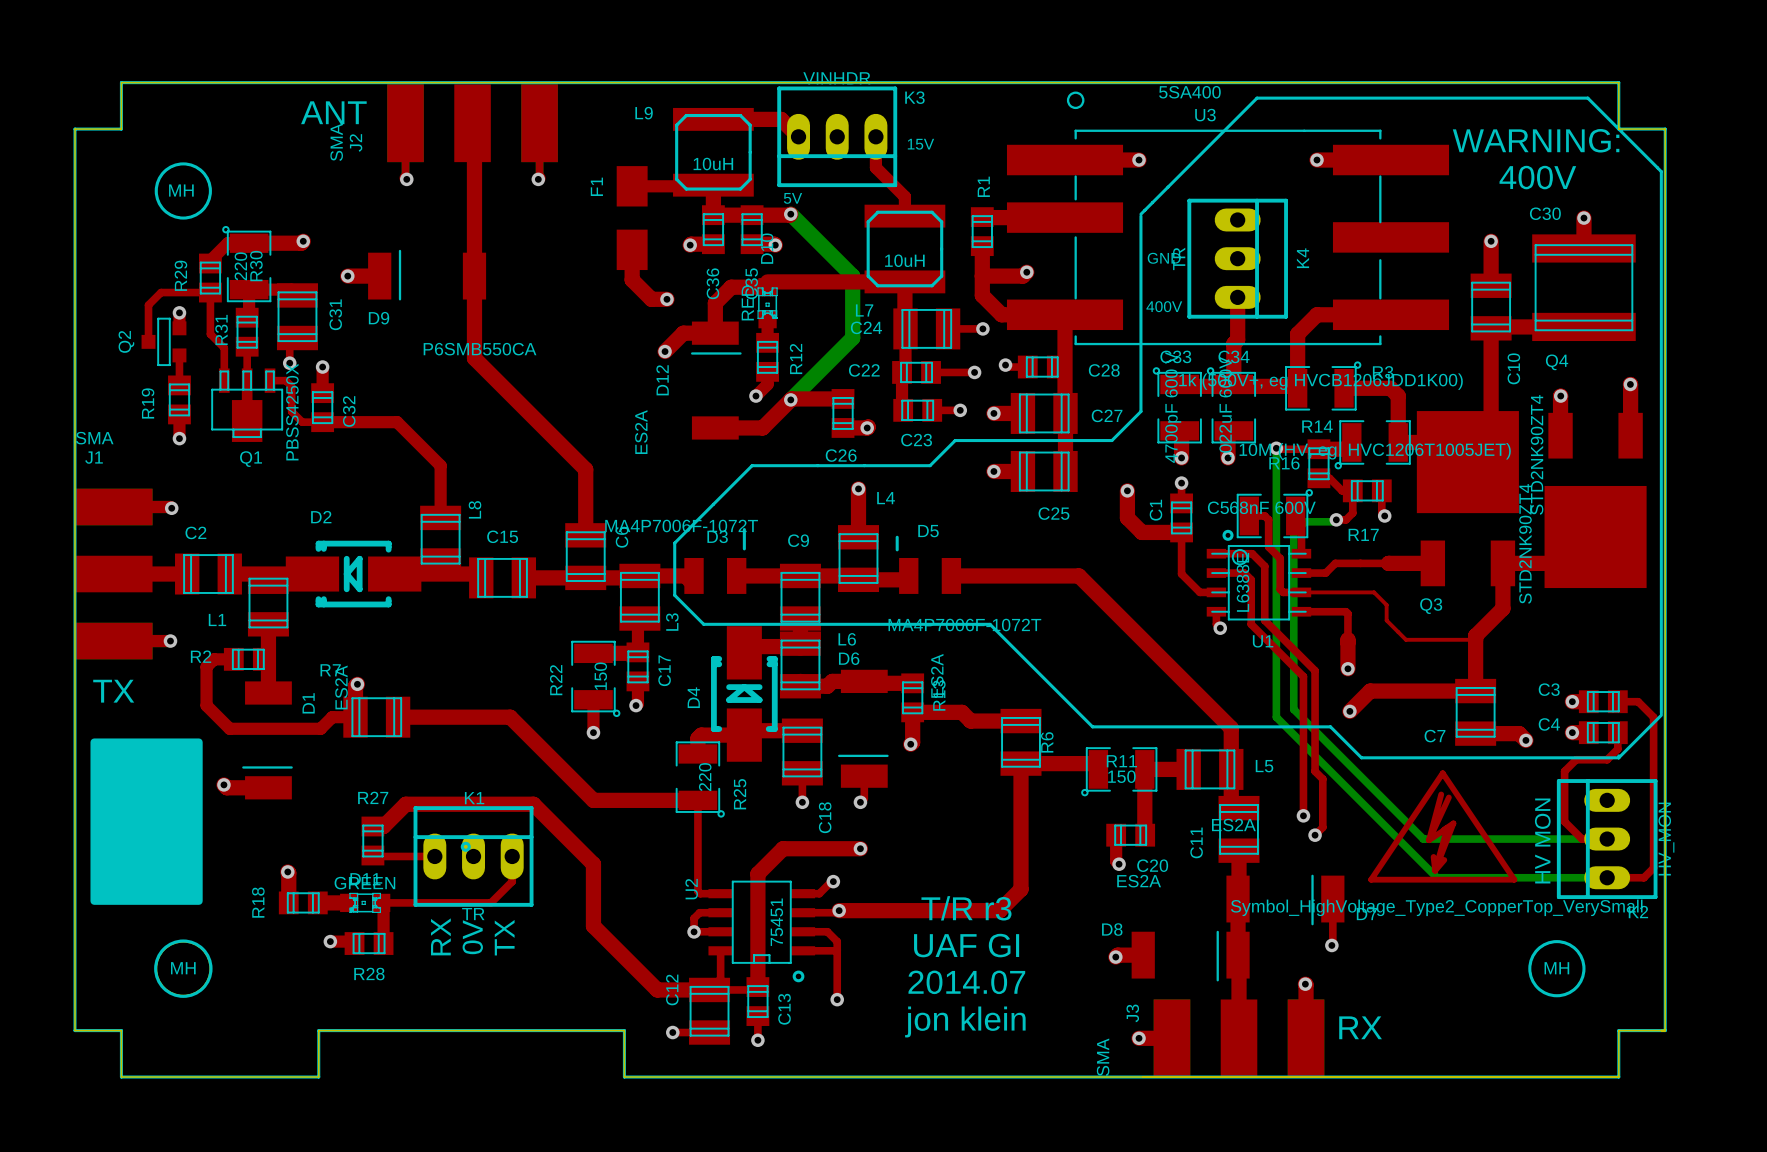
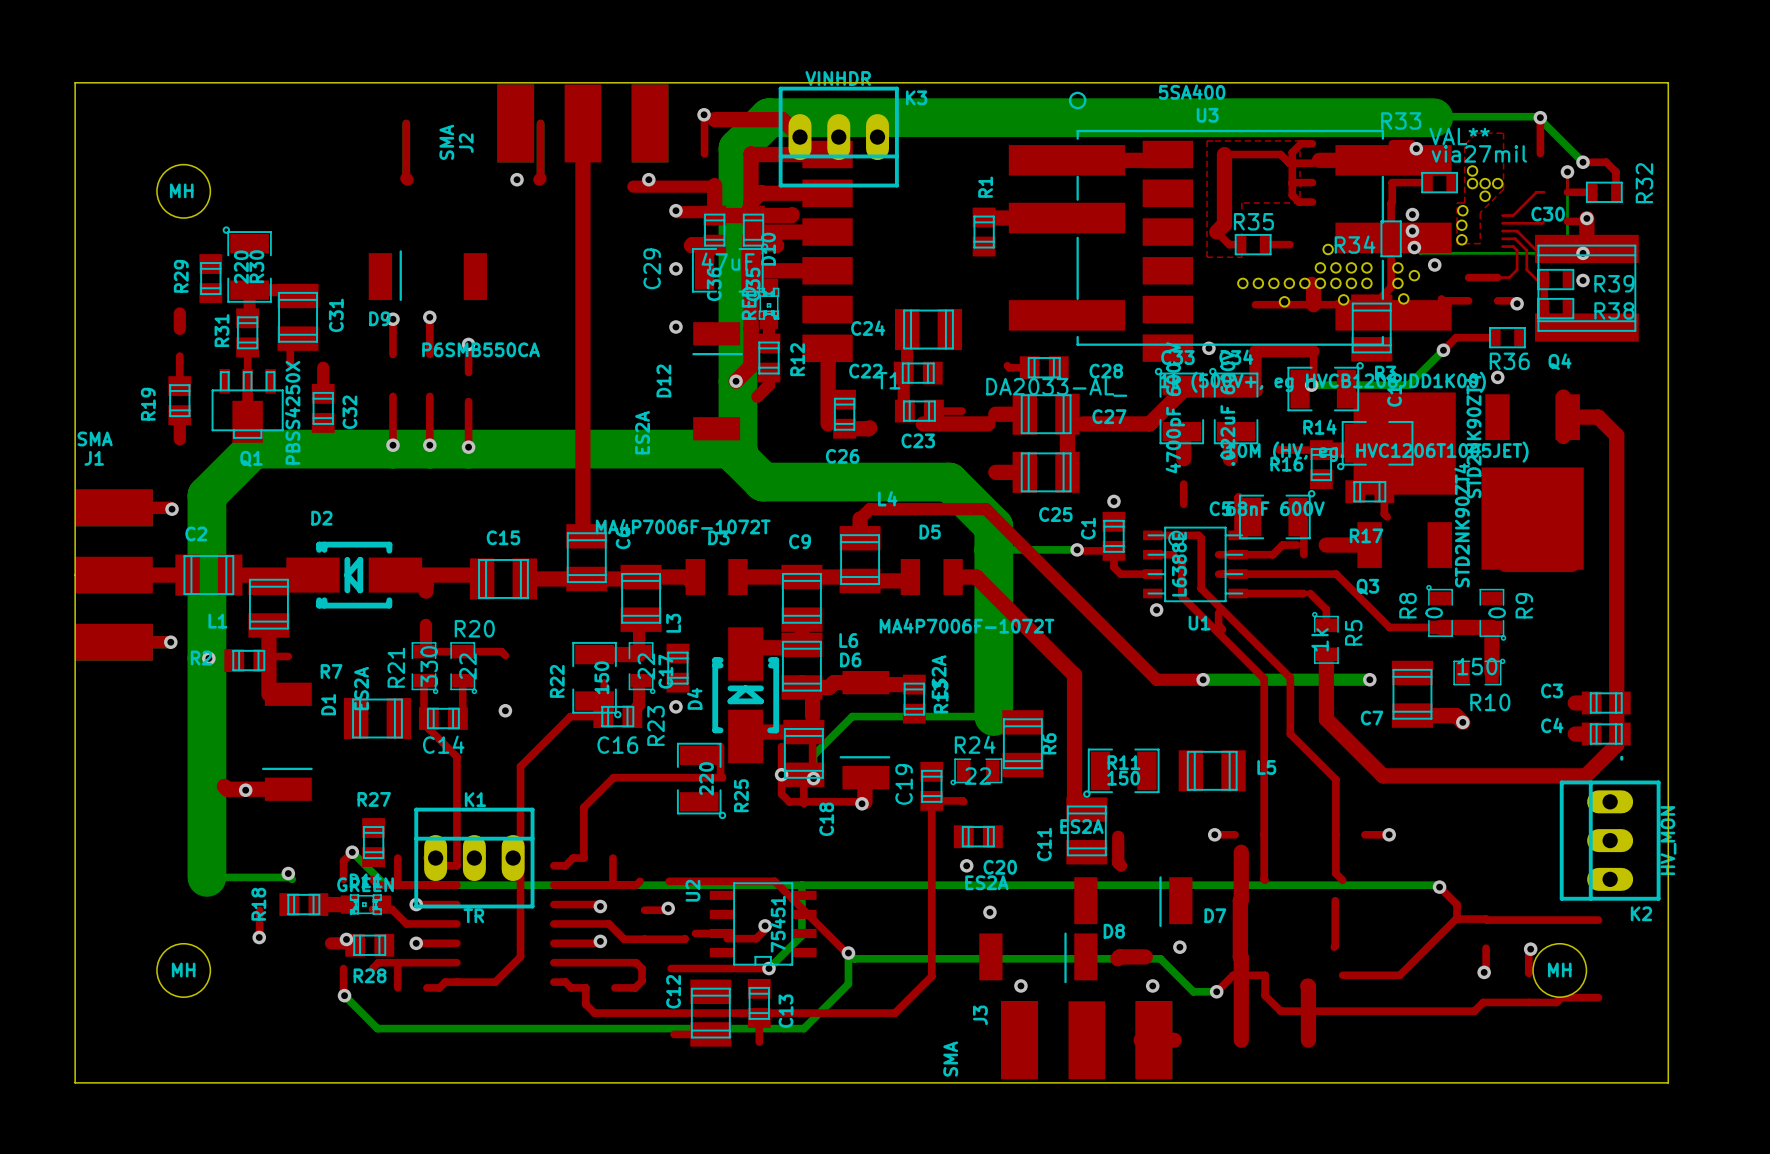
line: (121, 82) (121, 129) (74, 129) (74, 1030) (121, 1030) (121, 1077) (318, 1077) (318, 1030) (624, 1030) (624, 1077) (1618, 1077) (1618, 1030) (1665, 1030) (1665, 129) (1618, 129) (1618, 82) (121, 82) -> none
board edge: (121, 82) (121, 129) (74, 129) -> (121, 82) (75, 82) (75, 129)
board edge: (1618, 82) (1618, 129) (1665, 129) -> (1621, 82) (1668, 82) (1668, 129)
text: ANT (333, 112) -> none
top track: none -> (704, 114) (704, 154)
via: none -> (704, 114)
bottom track: none -> (1433, 116) (1539, 116) (1583, 162)
bottom track: none -> (1427, 117) (1429, 115) (1433, 115) (1433, 117) (768, 117) (737, 148) (737, 456) (763, 482) (949, 482) (993, 526) (993, 716) (852, 716) (813, 755) (813, 778)
top track: none -> (1540, 117) (1540, 153)
via: none -> (1540, 117)
top track: (472, 123) (474, 125) (474, 358) (585, 469) (585, 535) -> none
J2 position: (472, 123) -> (582, 123)
top track: none -> (582, 123) (582, 532)
top zone outline: none -> (1476, 133) (1464, 144) (1464, 202) (1457, 202) (1457, 243) (1480, 243) (1480, 212) (1503, 189) (1503, 133) (1476, 133)
top track: (875, 136) (875, 167) (904, 196) (904, 216) -> none
top zone outline: none -> (1207, 140) (1207, 257) (1241, 257) (1241, 202) (1300, 202) (1300, 140) (1207, 140)
text: WARNING: (1536, 140) -> none
top track: none -> (1312, 143) (1301, 143) (1292, 152) (1292, 195) (1299, 202) (1312, 202)
top track: none -> (1392, 143) (1411, 143) (1416, 148)
text: 15V (920, 144) -> none
via27mil: none -> VAL** (1478, 145)
via: none -> (1416, 148)
L9: 10uH (713, 152) -> none
top track: none -> (827, 154) (751, 154) (751, 366) (736, 381)
via: (1139, 160) -> none
via: (1317, 160) -> none
top track: none -> (1583, 162) (1606, 162) (1615, 171) (1615, 192)
via: none -> (1583, 162)
drawing: [154, 162, 212, 220] -> none
top track: none -> (1289, 163) (1280, 154) (1224, 154) (1224, 224) (1216, 232) (1229, 244) (1240, 245)
top track: none -> (1289, 163) (1312, 163)
part: none -> (1472, 170)
top track: none -> (1567, 171) (1567, 192) (1592, 192)
bottom track: none -> (1567, 171) (1567, 237) (1551, 253) (1420, 253) (1414, 247)
via: none -> (1567, 171)
text: 400V (1537, 177) -> none
via: (406, 179) -> none
via position: (538, 179) -> (517, 179)
via: none -> (648, 179)
top track: none -> (1292, 182) (1312, 182)
top track: none -> (1427, 182) (1392, 182) (1392, 201)
R33: none -> (1439, 182)
part: none -> (1472, 183)
part: none -> (1485, 183)
part: none -> (1497, 183)
top track: none -> (1544, 192) (1536, 192) (1513, 215) (1502, 215)
R32: none -> (1604, 192)
top track: none -> (827, 193) (760, 192) (751, 202)
part: none -> (1485, 196)
text: 5V (793, 198) -> none
top track: none -> (1392, 202) (1391, 227)
top track: none -> (675, 210) (704, 212)
via: none -> (675, 210)
part: none -> (1462, 210)
bottom track: (790, 214) (852, 276) (852, 338) (790, 399) -> none
via: (790, 214) -> none
line: (1140, 214) (1257, 98) (1587, 98) (1661, 171) (1661, 713) -> none
via: none -> (1412, 214)
line: (1140, 216) (1140, 411) (1111, 440) (955, 440) (930, 465) (752, 465) (674, 543) (674, 595) (703, 624) (990, 624) (1092, 726) (1330, 726) (1361, 757) (1618, 757) (1661, 715) -> none
F1: (632, 218) -> none
top track: none -> (1544, 221) (1542, 223) (1502, 223)
top track: none -> (1567, 221) (1583, 222)
part: none -> (1461, 225)
top track: none -> (751, 231) (827, 232)
via: none -> (1412, 231)
top track: none -> (1502, 231) (1517, 231) (1536, 250) (1544, 250)
R34: none -> (1391, 238)
top track: none -> (1502, 238) (1515, 238) (1526, 250) (1526, 269) (1536, 279) (1544, 279) (1544, 308)
part: none -> (1461, 239)
top track: (303, 241) (301, 243) (227, 243) (210, 260) (210, 263) -> none
via: (303, 241) -> none
top track: (1491, 241) (1491, 285) -> none
via: (1491, 241) -> none
R35: none -> (1253, 244)
top track: none -> (1264, 244) (1289, 244)
via: (690, 245) -> none
via: (775, 245) -> none
top track: (982, 246) (982, 295) (1001, 314) (1065, 314) (1065, 412) (1065, 413) (1065, 375) (1056, 367) -> none
top track: none -> (1502, 246) (1513, 246) (1517, 250) (1517, 269) (1509, 277) (1468, 277)
via: none -> (1414, 247)
top track: (632, 249) (632, 279) (651, 299) (666, 299) -> none
L7: 10uH (904, 249) -> none
part: none -> (1328, 249)
top track: none -> (1391, 250) (1391, 287) (1371, 306) (1369, 304) (1255, 304)
T1: none -> DA2033-AL_ (997, 251)
via: none -> (1583, 253)
text: GND (1164, 258) -> none
K4: TR (1237, 258) -> none
via: none -> (1434, 264)
C29: none -> 47uF (730, 267)
part: none -> (1320, 267)
part: none -> (1335, 267)
part: none -> (1351, 267)
part: none -> (1366, 267)
part: none -> (1397, 267)
via: none -> (675, 268)
top track: none -> (751, 270) (827, 270)
top track: (1026, 272) (1022, 276) (982, 276) -> none
via: (1026, 272) -> none
part: none -> (1414, 275)
top track: (347, 276) (379, 276) -> none
via: (347, 276) -> none
R39: none -> (1555, 279)
via: none -> (1583, 280)
part: none -> (1242, 283)
part: none -> (1258, 283)
part: none -> (1273, 283)
part: none -> (1289, 283)
part: none -> (1304, 283)
part: none -> (1320, 283)
part: none -> (1335, 283)
part: none -> (1351, 283)
part: none -> (1366, 283)
part: none -> (1397, 283)
top track: none -> (1311, 284) (1313, 286) (1313, 304)
top track: (1237, 297) (1237, 339) (1233, 343) (1233, 384) -> none
part: none -> (1403, 298)
top track: none -> (1441, 298) (1443, 300) (1468, 300)
via: (666, 299) -> none
part: none -> (1343, 299)
top track: none -> (1497, 300) (1514, 300) (1517, 303)
part: none -> (1284, 301)
via: none -> (1517, 303)
text: 400V (1164, 306) -> none
C10 position: (1491, 307) -> (1371, 327)
R38: none -> (1555, 308)
via: (179, 312) -> none
top track: (1391, 314) (1317, 314) (1297, 334) (1297, 388) (1295, 386) (1181, 386) -> none
top track: none -> (429, 317) (429, 354)
via: none -> (429, 317)
top track: none -> (392, 319) (392, 354)
via: none -> (392, 319)
via: none -> (675, 327)
top track: (1583, 326) (1491, 328) (1491, 438) -> none
top track: (906, 327) (904, 328) (904, 281) (767, 281) (767, 287) (731, 287) (715, 303) (715, 333) (683, 333) (665, 351) -> none
top track: (947, 328) (982, 328) -> none
via: (982, 328) -> none
top track: none -> (1495, 337) (1456, 337) (1443, 350)
R36: none -> (1507, 337)
top track: (148, 341) (148, 305) (161, 292) (210, 292) (210, 334) (224, 348) (224, 380) -> none
Q2: (163, 341) -> none
top track: none -> (468, 344) (468, 372)
via: none -> (468, 344)
top track: none -> (827, 348) (828, 423)
via: none -> (1208, 348)
bottom track: none -> (1443, 350) (1408, 385) (1311, 385)
via: none -> (1443, 350)
via: (665, 351) -> none
via: (289, 363) -> none
via: (1005, 365) -> none
via: (322, 367) -> none
top track: (937, 372) (974, 372) -> none
via: (974, 372) -> none
via: none -> (1497, 377)
top track: (270, 380) (285, 380) (291, 386) (291, 411) (302, 422) (322, 422) -> none
top track: none -> (1311, 385) (1313, 383) (1313, 351) (1255, 351) (1255, 389) (1183, 389) (1149, 423) (1082, 423)
via: none -> (1311, 385)
top track: (1630, 384) (1630, 435) -> none
via: (1630, 384) -> none
top track: (1344, 388) (1390, 388) (1398, 396) (1398, 442) (1448, 442) -> none
top track: none -> (392, 396) (392, 445)
top track: none -> (429, 396) (429, 445)
via position: (755, 396) -> (736, 381)
via: (1560, 396) -> none
top track: (843, 398) (791, 398) (762, 427) (715, 427) -> none
via: (790, 399) -> none
top track: none -> (468, 401) (468, 447)
via: (960, 410) -> none
via: (993, 413) -> none
top track: none -> (1567, 417) (1598, 417) (1616, 435) (1616, 744) (1585, 775) (1382, 775) (1326, 719) (1326, 654)
top track: (322, 422) (397, 422) (440, 465) (440, 517) -> none
top track: none -> (923, 423) (987, 423)
via: (867, 427) -> none
via: (179, 438) -> none
via: none -> (392, 445)
via: none -> (429, 445)
via: none -> (468, 447)
bottom track: none -> (737, 449) (253, 449) (206, 495) (206, 877) (290, 877) (292, 879)
bottom track: (1276, 448) (1276, 717) (1436, 877) (1607, 877) -> none
via: (1276, 448) -> none
via: (1181, 457) -> none
via: (1228, 457) -> none
via: (993, 471) -> none
top track: (1318, 478) (1329, 478) (1342, 490) (1352, 490) (1352, 513) (1346, 519) (1336, 519) -> none
via: (1181, 483) -> none
top track: (858, 488) (858, 517) -> (1203, 679) (1156, 679) (986, 509) (869, 509) (860, 518)
via: (858, 488) -> none
top track: (1127, 490) (1127, 517) (1141, 532) (1181, 532) (1181, 574) (1199, 592) (1216, 592) -> none
via position: (1127, 490) -> (1113, 501)
top track: none -> (1238, 496) (1238, 535)
Q3 position: (1467, 498) -> (1404, 480)
Q4 position: (1595, 500) -> (1532, 481)
top track: (1249, 515) (1264, 515) (1268, 519) (1268, 546) (1280, 558) (1280, 589) (1283, 592) -> (1238, 593) (1285, 593)
via: (1384, 515) -> none
C1 position: (1181, 517) -> (1113, 536)
bottom track: (1336, 519) (1334, 521) (1305, 521) (1293, 533) (1293, 709) (1423, 839) (1607, 839) -> none
via: (1336, 519) -> none
line: (744, 529) (744, 548) -> none
drawing: [1222, 529, 1234, 541] -> none
top track: none -> (1152, 535) (1198, 535) (1201, 538) (1201, 588) (1290, 677) (1290, 734) (1335, 779) (1335, 873) (1342, 880)
line: (897, 537) (897, 549) -> none
L8: (440, 539) -> none
top track: none -> (1326, 545) (1369, 545)
bottom track: none -> (993, 549) (1077, 549)
top track: none -> (1077, 549) (1113, 550) (1113, 567) (1120, 574) (1152, 574)
via: none -> (1077, 549)
top track: none -> (1152, 554) (1173, 554) (1181, 563) (1181, 596) (1264, 678) (1265, 880)
top track: (1252, 553) (1264, 566) (1264, 620) (1315, 670) (1315, 771) (1322, 779) (1322, 827) (1315, 835) -> (1254, 554) (1272, 554) (1282, 545) (1297, 545)
top track: (1432, 563) (1335, 563) (1325, 573) -> (1491, 672) (1491, 627) (1389, 627) (1336, 574) (1328, 574)
top track: (1503, 564) (1502, 608) (1475, 635) (1475, 691) (1370, 691) (1349, 711) -> none
top track: (1244, 573) (1251, 579) (1251, 624) (1303, 676) (1303, 815) -> (1246, 574) (1303, 574)
top track: (974, 575) (1079, 575) (1231, 728) (1231, 800) (1239, 808) -> (976, 577) (1074, 675) (1074, 797) (1086, 809)
top track: none -> (420, 578) (425, 584) (425, 591)
U1 position: (1258, 582) -> (1195, 564)
top track: (1307, 592) (1374, 592) (1386, 604) (1386, 620) (1405, 639) (1475, 639) -> (1310, 593) (1326, 609) (1326, 625)
via: none -> (1156, 609)
R8: none -> 0 (1439, 610)
top track: (1301, 611) (1346, 611) (1347, 613) (1347, 668) -> none
R9: none -> 0 (1492, 614)
top track: none -> (425, 624) (425, 649) (424, 651) (501, 651) (505, 655)
via: (1220, 628) -> none
R5: none -> 1k (1325, 637)
top track: none -> (271, 656) (288, 656)
via: none -> (208, 658)
top track: (233, 660) (233, 659) (214, 659) (206, 666) (206, 705) (229, 728) (320, 728) (332, 717) (355, 717) (355, 686) (357, 684) -> none
R21: none -> 330 (424, 668)
R20: none -> 22 (463, 668)
C17 position: (637, 666) -> (677, 668)
R23: none -> 22 (642, 668)
via: (1347, 668) -> none
R10: none -> 150 (1479, 671)
bottom track: none -> (1203, 679) (1369, 679)
via: none -> (1203, 679)
via: none -> (1369, 679)
top track: none -> (424, 680) (424, 713) (428, 718) (428, 728) (456, 756) (456, 865) (445, 865) (439, 859) (428, 859) (426, 858)
top track: none -> (462, 680) (462, 713) (457, 718)
top track: none -> (604, 682) (604, 715) (570, 716) (520, 766) (520, 956) (495, 982) (445, 982) (439, 987) (426, 987)
top track: none -> (801, 682) (812, 693) (812, 716)
via: (357, 684) -> none
text: TX (113, 691) -> none
top track: (593, 699) (593, 732) -> none
via: (1572, 701) -> none
top track: (1617, 701) (1638, 701) (1653, 717) (1653, 868) (1643, 877) (1607, 877) -> none
via position: (636, 705) -> (675, 706)
via: none -> (505, 710)
via: (1349, 711) -> none
C7 position: (1475, 712) -> (1412, 694)
C16: none -> (617, 716)
top track: (398, 717) (510, 717) (593, 800) (697, 800) (697, 891) (700, 893) (720, 893) -> none
C14: none -> (443, 718)
top track: (1021, 721) (970, 721) (962, 712) (912, 712) (912, 742) (910, 744) -> none
via: none -> (1462, 722)
via: (593, 732) -> none
via: (1572, 732) -> none
top track: (1617, 732) (1617, 749) (1607, 759) (1576, 759) (1564, 771) (1564, 821) (1582, 839) (1607, 839) -> none
top track: (1475, 733) (1519, 733) (1525, 740) -> (1412, 715) (1456, 715) (1462, 722)
top track: (744, 735) (701, 735) (697, 738) (697, 753) -> none
drawing: [90, 738, 203, 905] -> none
D1 position: (267, 740) -> (287, 741)
via: (1525, 740) -> none
top track: none -> (812, 745) (813, 778)
via: (910, 744) -> none
top track: none -> (720, 746) (720, 775) (722, 777) (613, 777) (583, 807) (583, 858) (573, 858) (565, 865) (553, 865)
top track: none -> (781, 746) (781, 794) (789, 801) (864, 801) (864, 777)
top track: (1098, 769) (1092, 763) (1021, 763) (1021, 889) (999, 910) (839, 910) (837, 912) (802, 912) -> none
top track: (1188, 769) (1144, 769) (1145, 835) -> none
R24: none -> 22 (976, 771)
drawing: [1368, 770, 1518, 883] -> none
via: none -> (781, 774)
via: none -> (813, 778)
via position: (223, 784) -> (245, 790)
C19: none -> (931, 786)
top track: none -> (931, 800) (931, 976) (894, 1013) (594, 1013) (585, 1004) (585, 987) (571, 987) (565, 982) (553, 982)
top track: none -> (931, 800) (963, 801)
via: (802, 802) -> none
via: (1303, 815) -> none
top track: (372, 826) (383, 826) (405, 804) (533, 804) (593, 864) (593, 926) (657, 989) (709, 989) -> none
C11 position: (1239, 829) -> (1086, 830)
top track: none -> (1214, 834) (1235, 834)
via: none -> (1214, 834)
top track: none -> (1364, 834) (1389, 834)
via: none -> (1389, 834)
C20 position: (1130, 835) -> (978, 836)
via: (1315, 835) -> none
text: HV MON (1542, 840) -> none
drawing: [460, 841, 471, 852] -> none
top track: (860, 848) (783, 848) (757, 873) (757, 987) (755, 989) (709, 989) -> none
via: (860, 848) -> none
top track: none -> (352, 852) (343, 860) (343, 879)
bottom track: none -> (352, 852) (385, 885) (1437, 885) (1439, 887)
via: none -> (352, 852)
top track: (372, 855) (434, 856) -> none
top track: (513, 855) (512, 881) (490, 902) (456, 902) -> none
top track: none -> (397, 858) (397, 885)
top track: none -> (612, 858) (612, 885)
via: none -> (966, 865)
via: (1119, 864) -> none
top track: (287, 871) (288, 902) -> none
top track: none -> (372, 879) (378, 885) (456, 885)
top track: none -> (640, 881) (636, 885) (553, 885)
top track: none -> (669, 881) (774, 881) (848, 953)
top track: (833, 881) (819, 893) (802, 893) -> none
via: (833, 881) -> none
bottom track: none -> (801, 885) (801, 935) (768, 968)
top track: none -> (1439, 887) (1457, 904) (1457, 919)
via: none -> (1439, 887)
D7 position: (1285, 900) -> (1133, 901)
top track: (415, 902) (383, 902) (383, 941) -> none
via: none -> (416, 904)
top track: none -> (553, 904) (598, 904) (600, 906)
via: none -> (600, 906)
top track: none -> (668, 908) (666, 910) (644, 910)
via: none -> (668, 908)
top track: none -> (372, 909) (392, 909) (406, 923) (456, 923)
top track: none -> (259, 910) (259, 937)
text: T/R r3 (966, 908) -> none
via: (839, 910) -> none
via: none -> (989, 912)
top track: (720, 912) (699, 912) (694, 918) (694, 931) -> none
top track: none -> (1598, 920) (1456, 919) (1399, 975) (1342, 975)
top track: none -> (553, 923) (608, 923) (624, 939) (685, 938)
top track: none -> (765, 925) (765, 929) (756, 938) (727, 938)
via: none -> (765, 925)
via: (694, 931) -> none
top track: (802, 931) (827, 931) (837, 941) (837, 999) -> none
via: none -> (259, 937)
text: RX (440, 936) -> none
text: 0V (472, 937) -> none
text: TX (504, 937) -> none
drawing: [154, 939, 213, 998] -> none
top track: none -> (600, 941) (598, 943) (553, 943)
via: none -> (600, 941)
drawing: [1528, 940, 1586, 998] -> none
via position: (330, 941) -> (346, 939)
top track: none -> (416, 943) (456, 943)
via: none -> (416, 943)
text: UAF GI (966, 945) -> none
via: none -> (1179, 947)
via: (1331, 945) -> none
top track: none -> (1486, 948) (1486, 970) (1484, 972)
top track: none -> (1530, 949) (1528, 951) (1528, 973)
via: none -> (1530, 949)
top track: (720, 950) (720, 978) (709, 989) -> none
top track: (802, 950) (837, 950) -> none
via: none -> (848, 953)
D8 position: (1190, 956) -> (1038, 957)
via: (1115, 957) -> none
top track: none -> (397, 962) (397, 987)
top track: none -> (456, 962) (378, 962) (372, 968)
top track: none -> (553, 962) (636, 962) (642, 968) (642, 981) (635, 987) (614, 987)
top track: none -> (343, 968) (344, 995)
top track: none -> (671, 968) (768, 968)
via: none -> (768, 968)
drawing: [792, 970, 805, 983] -> none
via: none -> (1484, 972)
text: 2014.07 (966, 982) -> none
via: none -> (1020, 985)
via: none -> (1152, 985)
via: (1305, 984) -> none
top track: none -> (1216, 991) (1233, 975) (1265, 975) (1265, 995) (1280, 1011) (1474, 1011) (1483, 1002) (1556, 1002) (1561, 997) (1598, 997)
bottom track: none -> (1216, 991) (1193, 991) (1160, 958) (854, 958) (848, 953) (848, 984) (803, 1028) (377, 1028) (344, 995)
via: none -> (1216, 991)
via: none -> (344, 995)
via: (837, 999) -> none
text: jon klein (965, 1021) -> none
text: RX (1360, 1027) -> none
board edge: (74, 1030) (121, 1030) (121, 1077) (318, 1077) (318, 1030) (624, 1030) (624, 1077) (1618, 1077) (1618, 1030) (1665, 1030) -> (75, 1032) (75, 1082) (1668, 1082) (1668, 1032)
via: (672, 1032) -> none
via: (1139, 1038) -> none
J3 position: (1239, 1038) -> (1086, 1040)
via: (757, 1040) -> none

